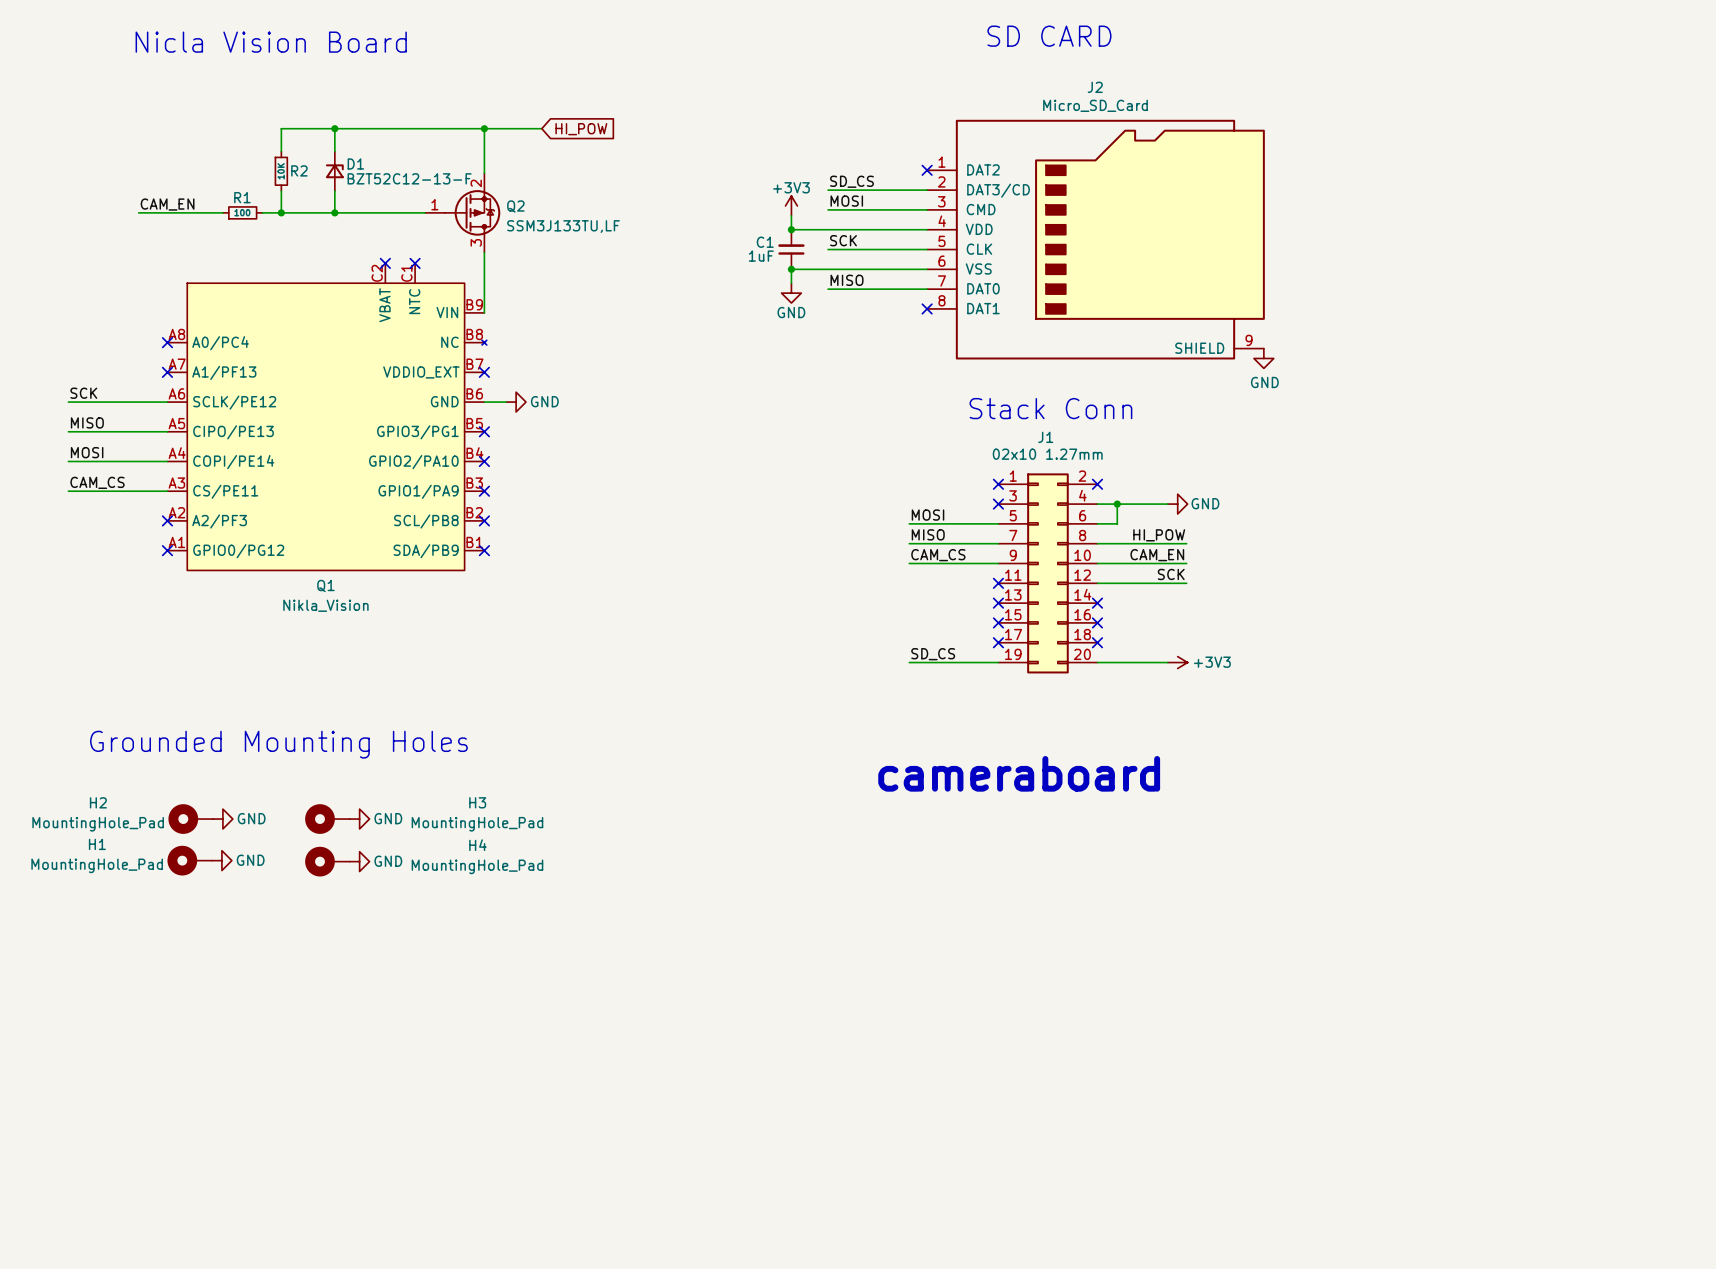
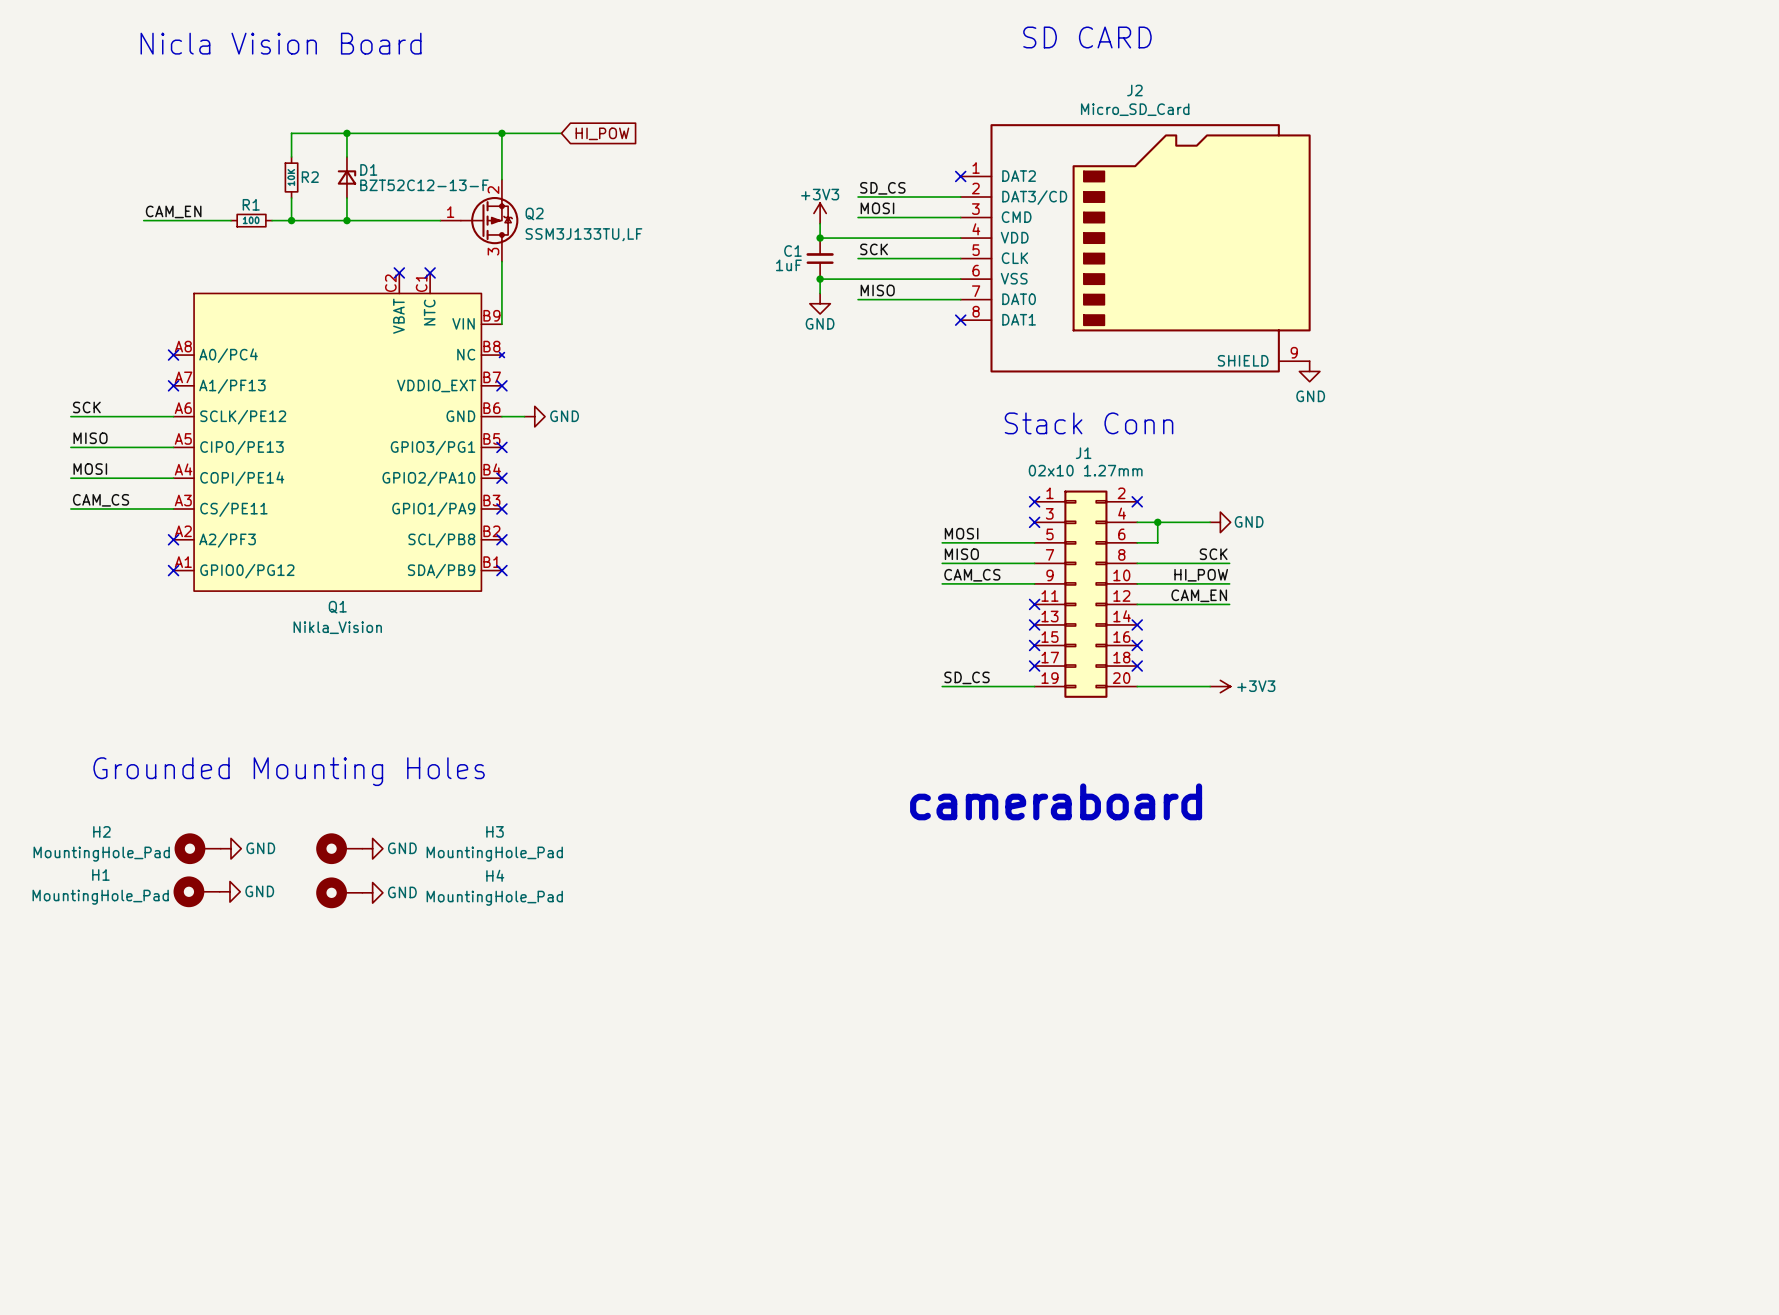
label: HI_POW (1159, 535) -> SCK (1213, 554)
label: CAM_EN (1157, 555) -> HI_POW (1201, 575)
label: SCK (1171, 574) -> CAM_EN (1199, 595)

